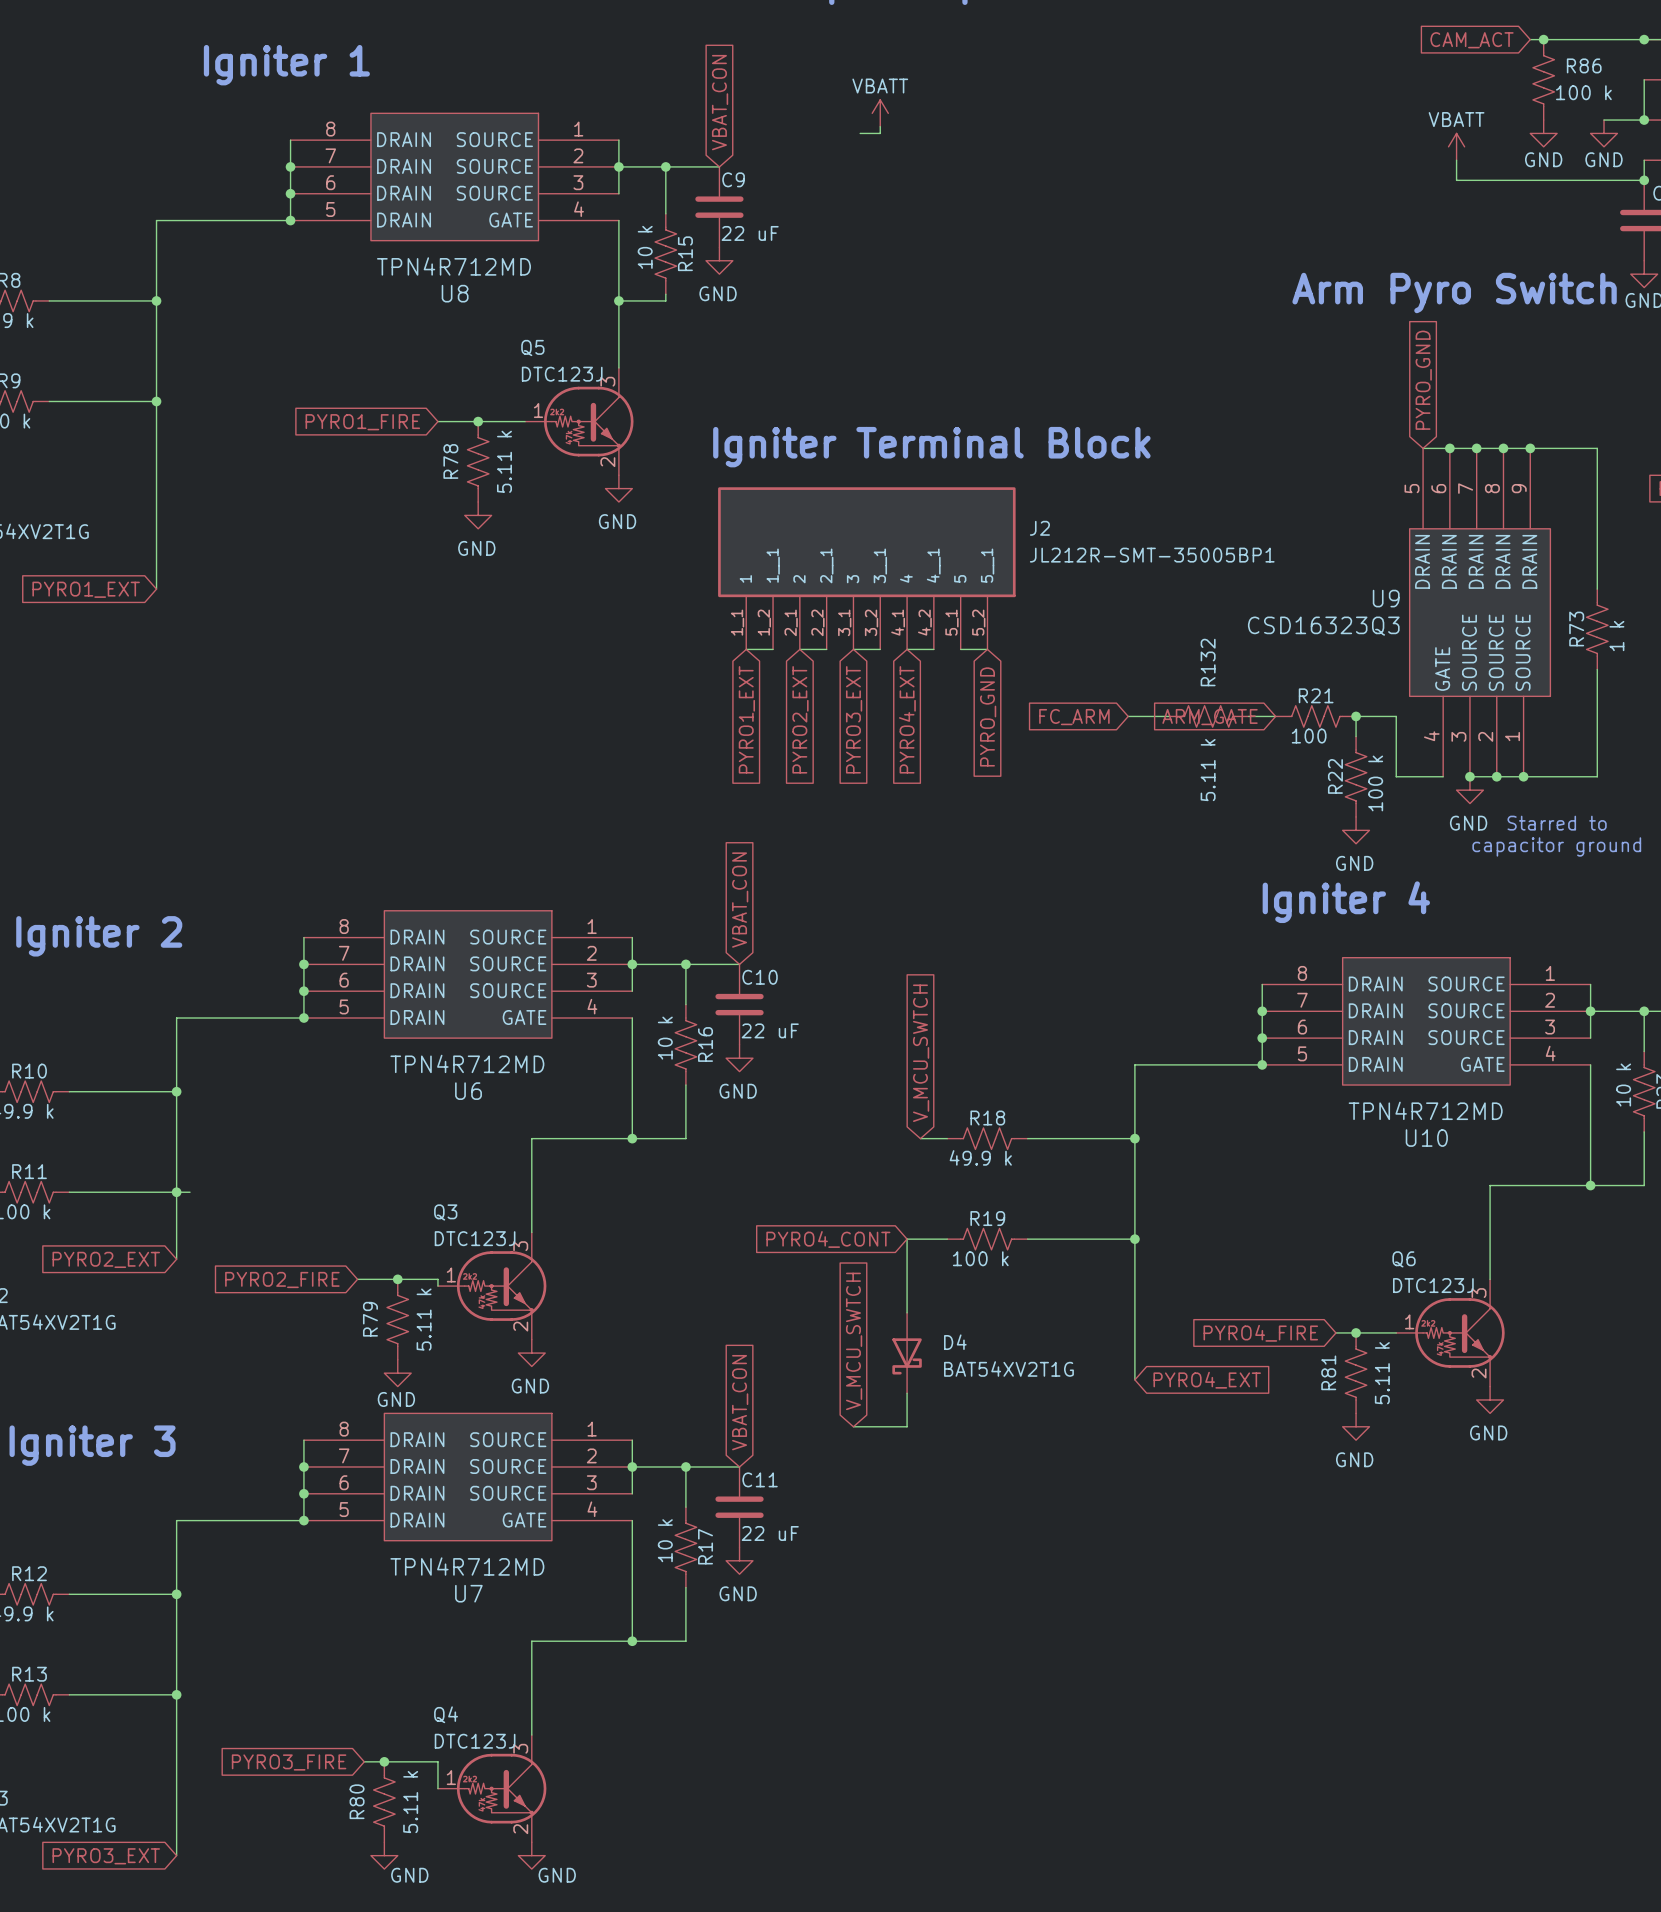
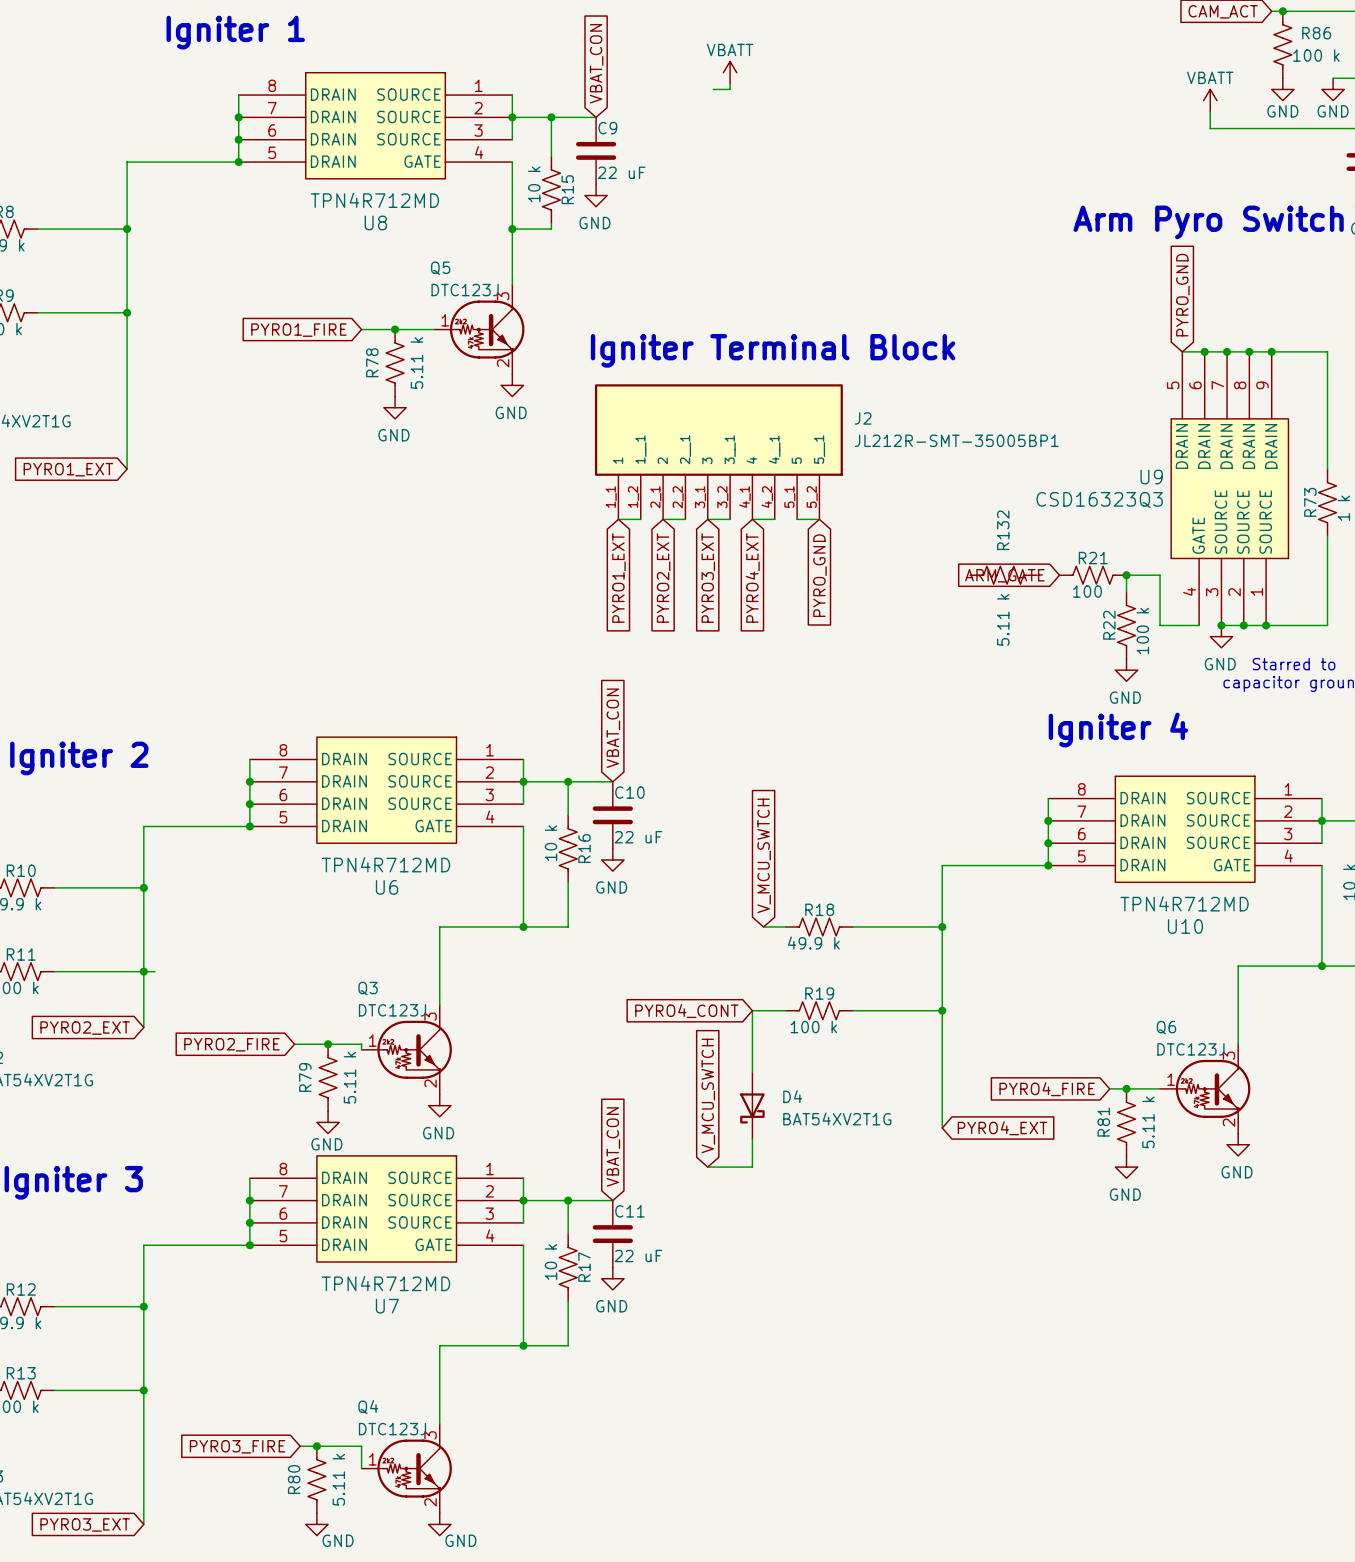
wire: (1128, 716) (1168, 716) -> none
wire: (1248, 716) (1275, 716) -> none
global label: FC_ARM (1074, 717) -> none

